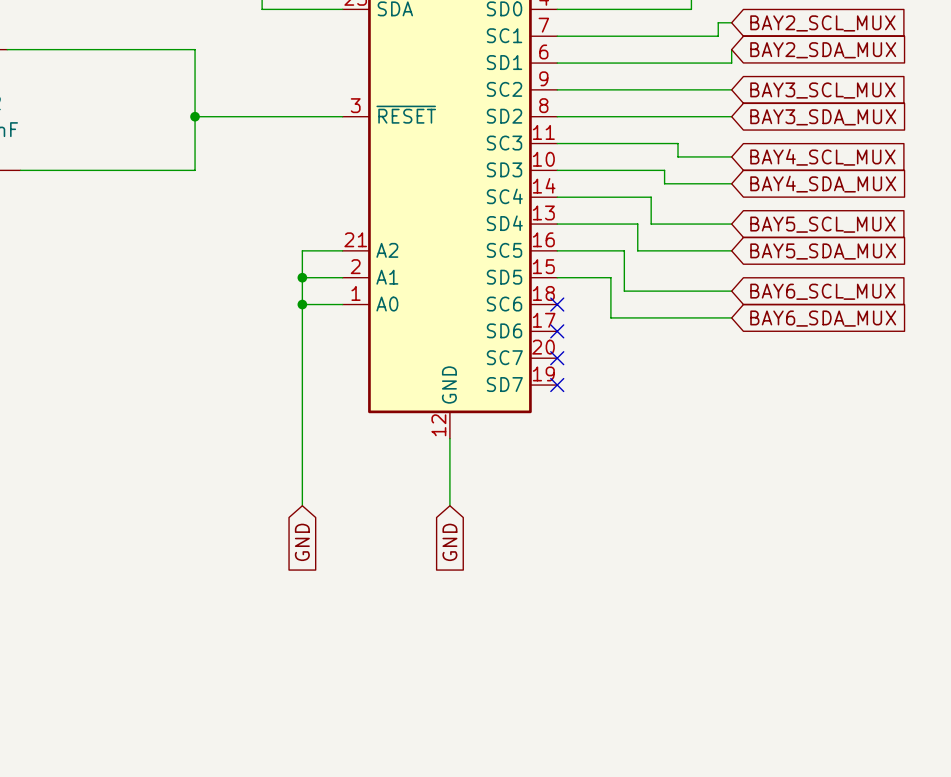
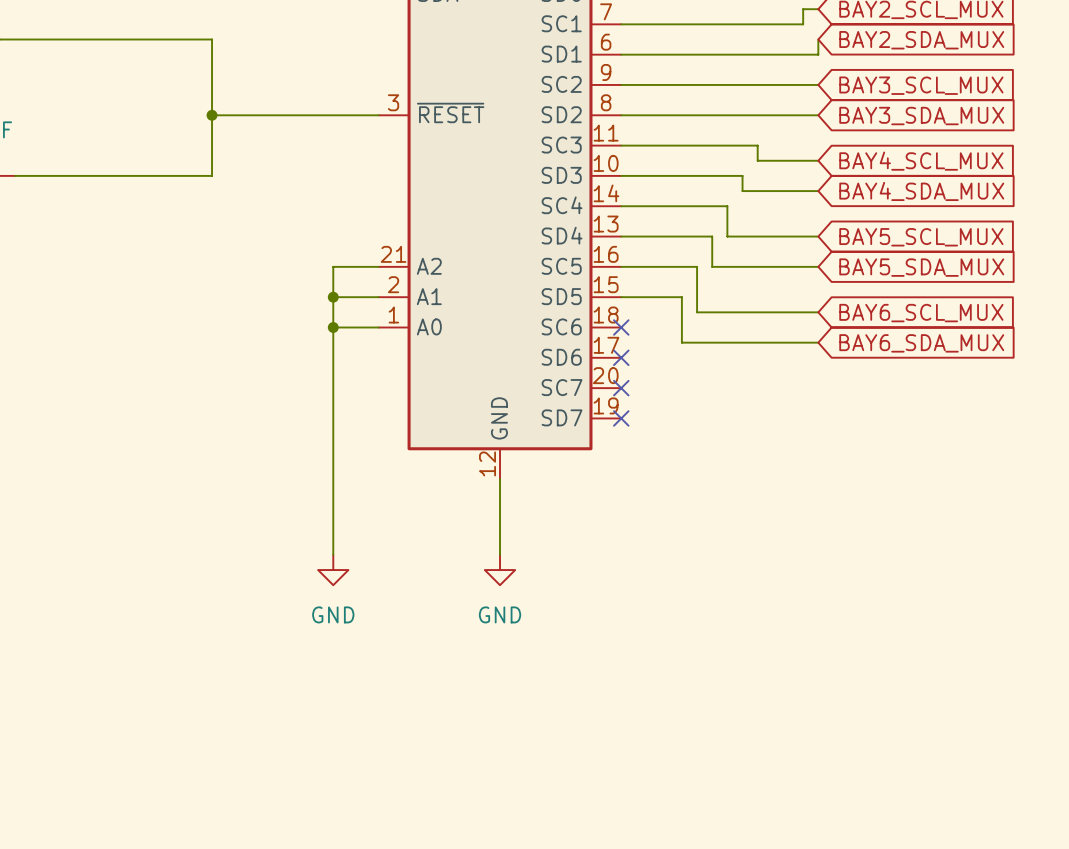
power symbol: none -> GND (333, 570)
power symbol: none -> GND (500, 570)
global label: GND (302, 542) -> none
global label: GND (449, 542) -> none

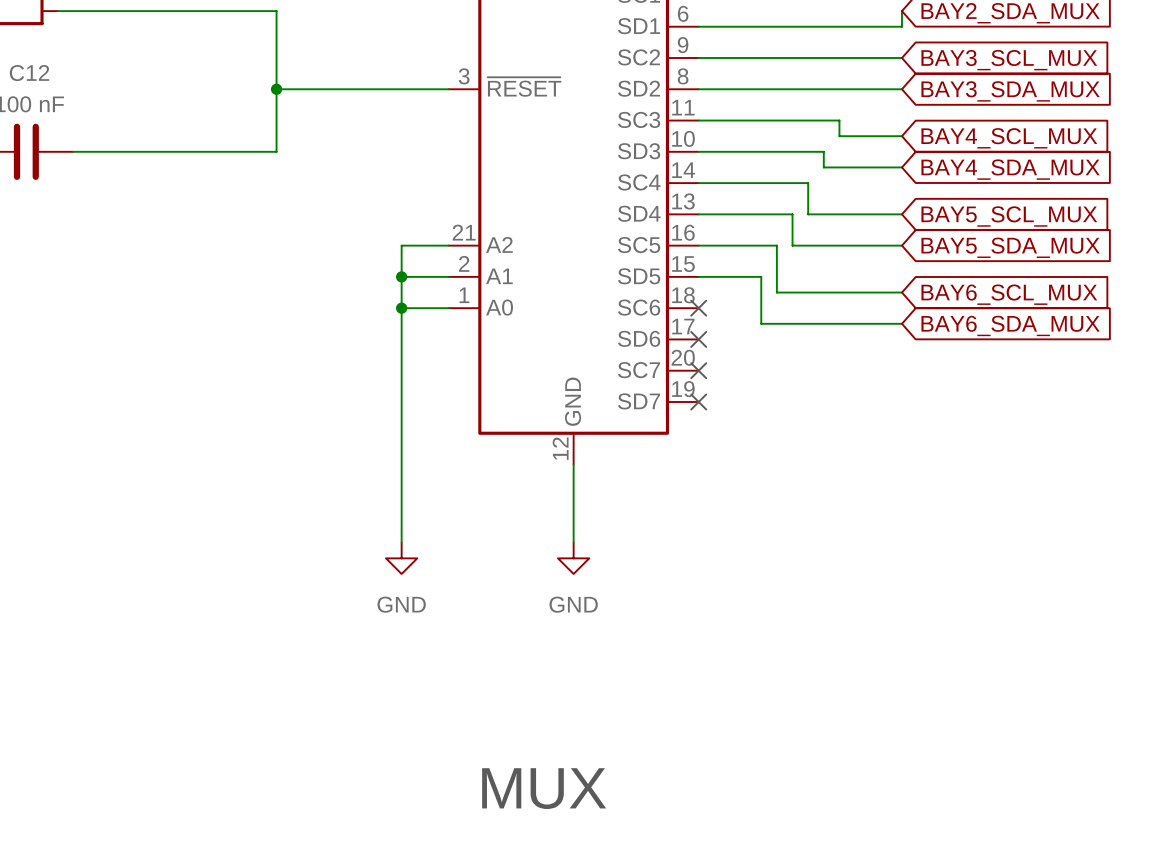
text: none -> MUX (544, 788)

